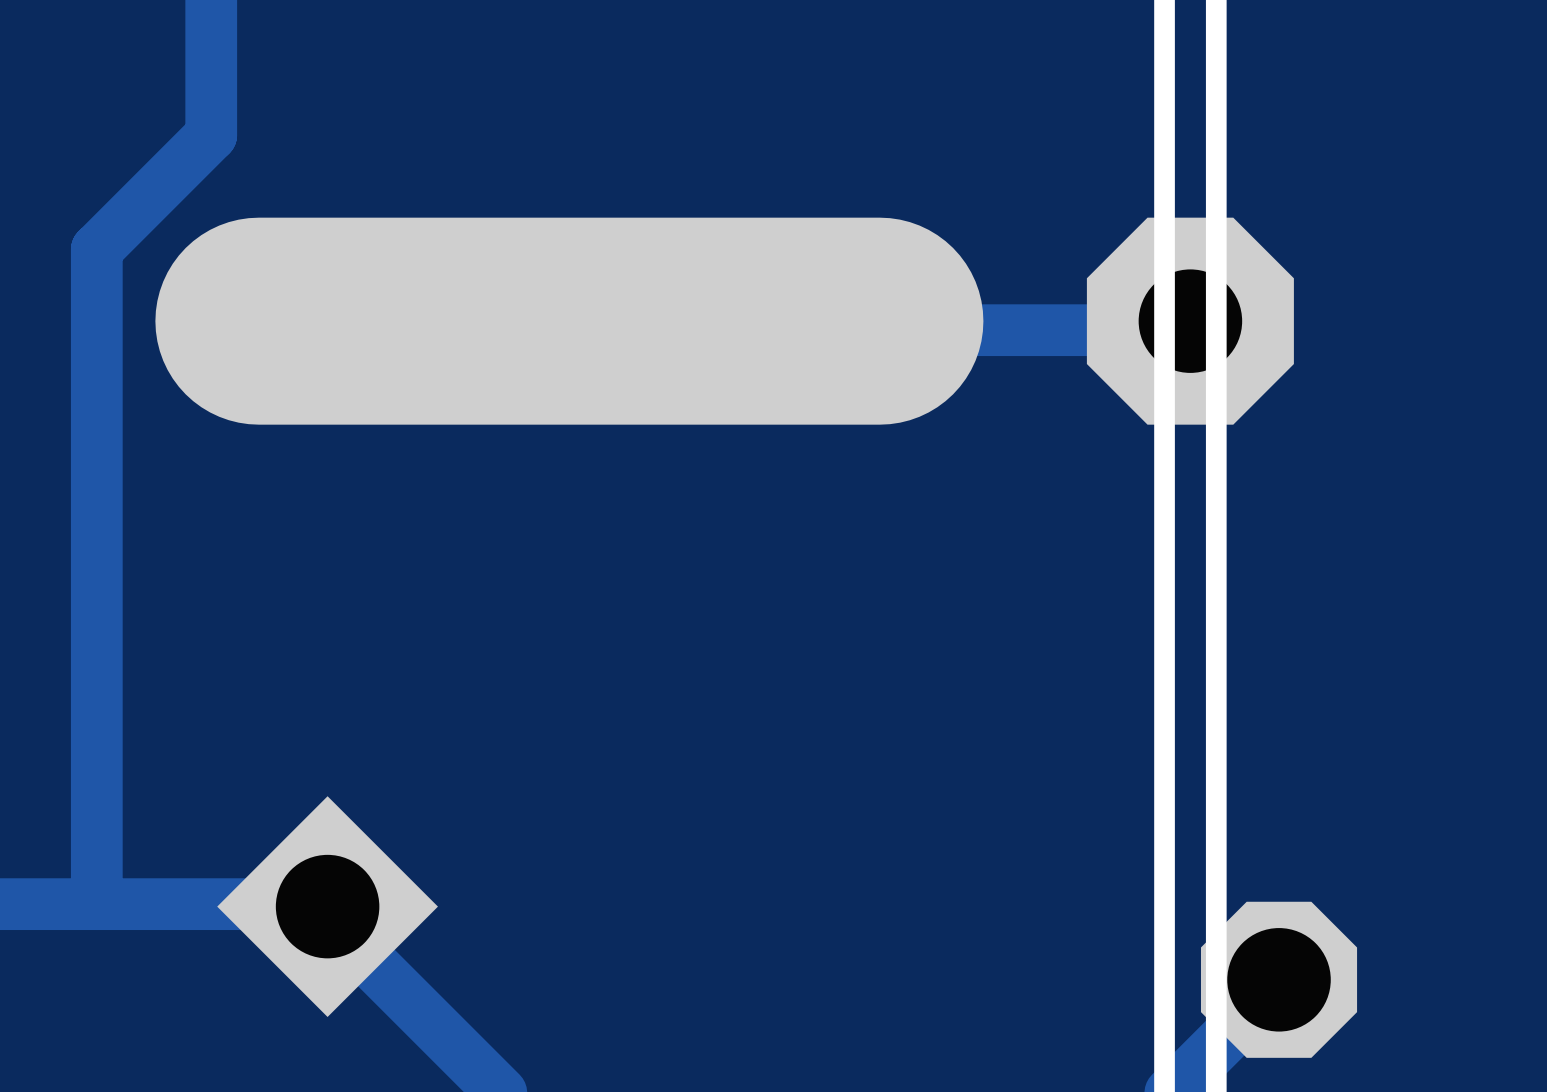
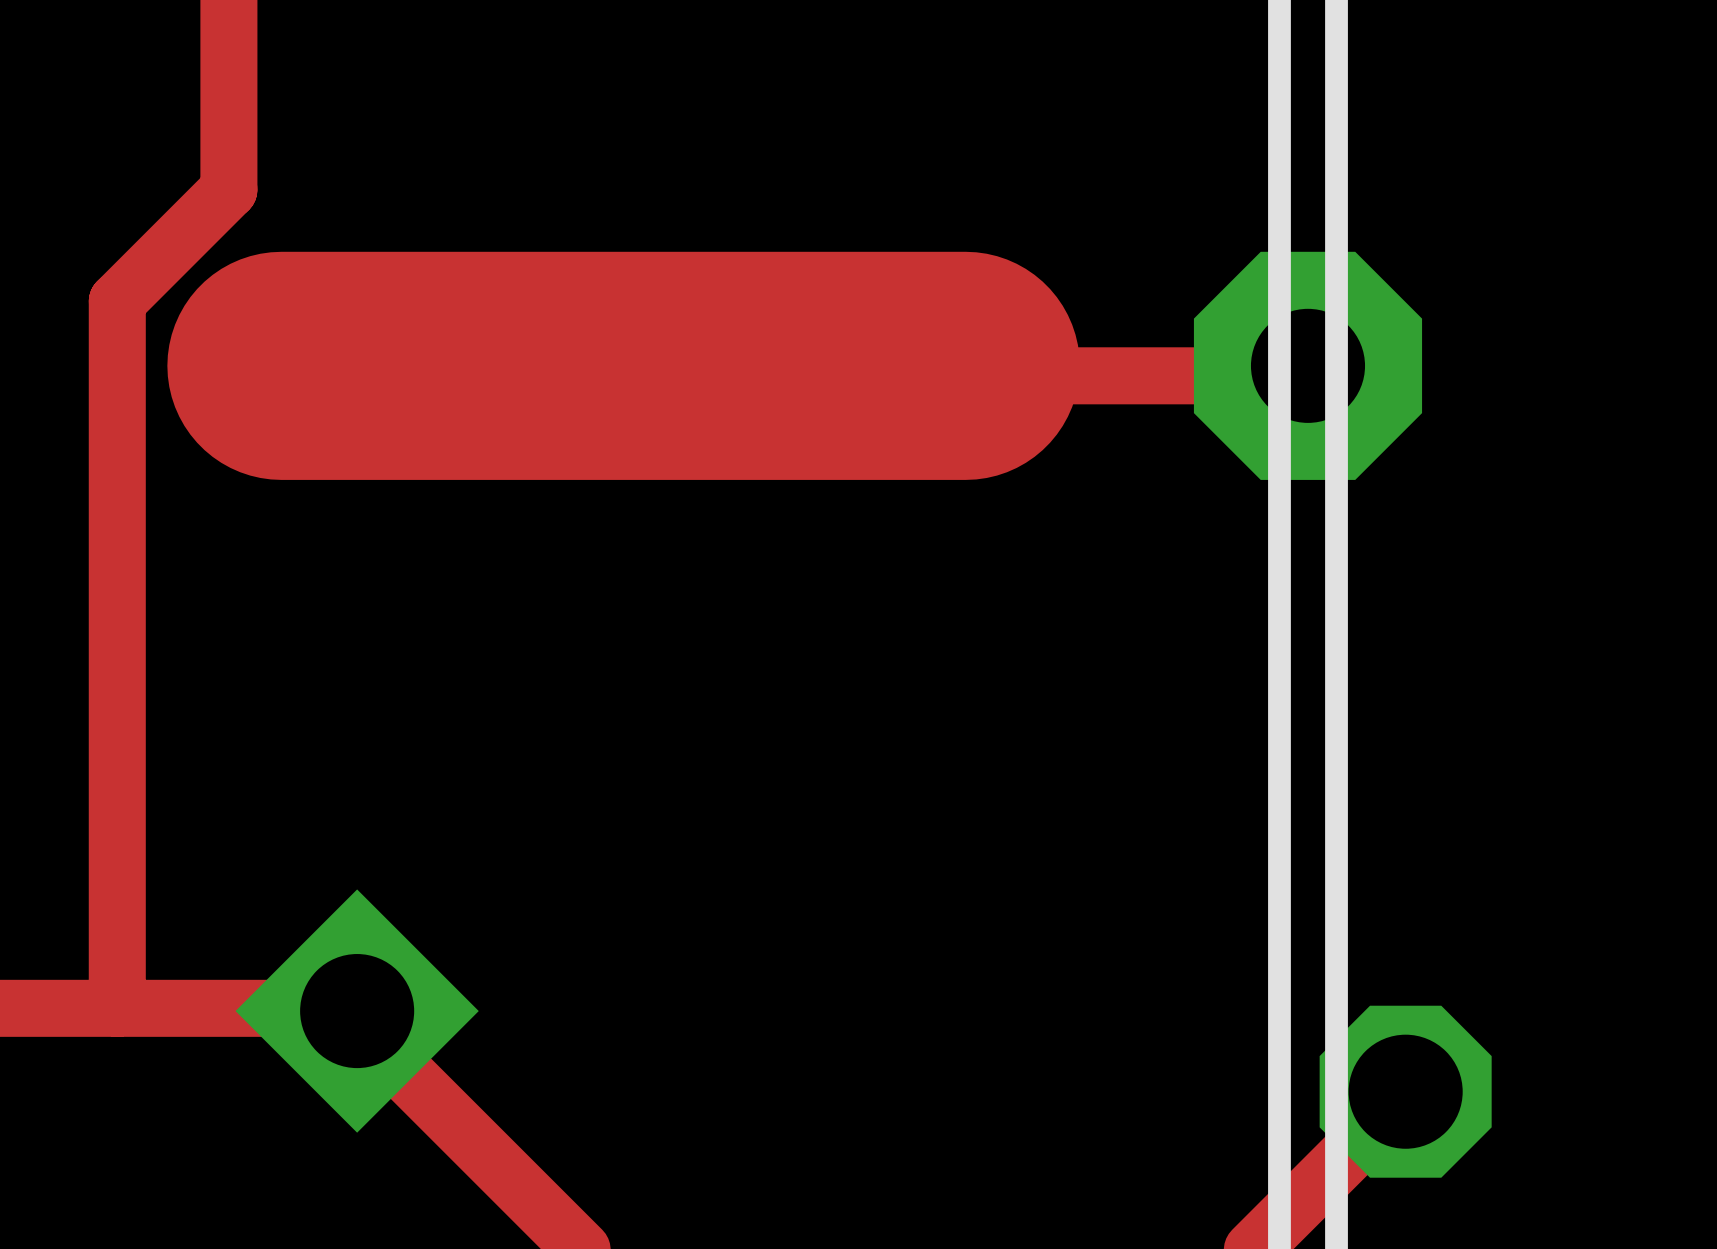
track: (211, 135) (96, 249) (96, 904) -> (228, 160) (228, 189) (117, 301) (117, 1008)

